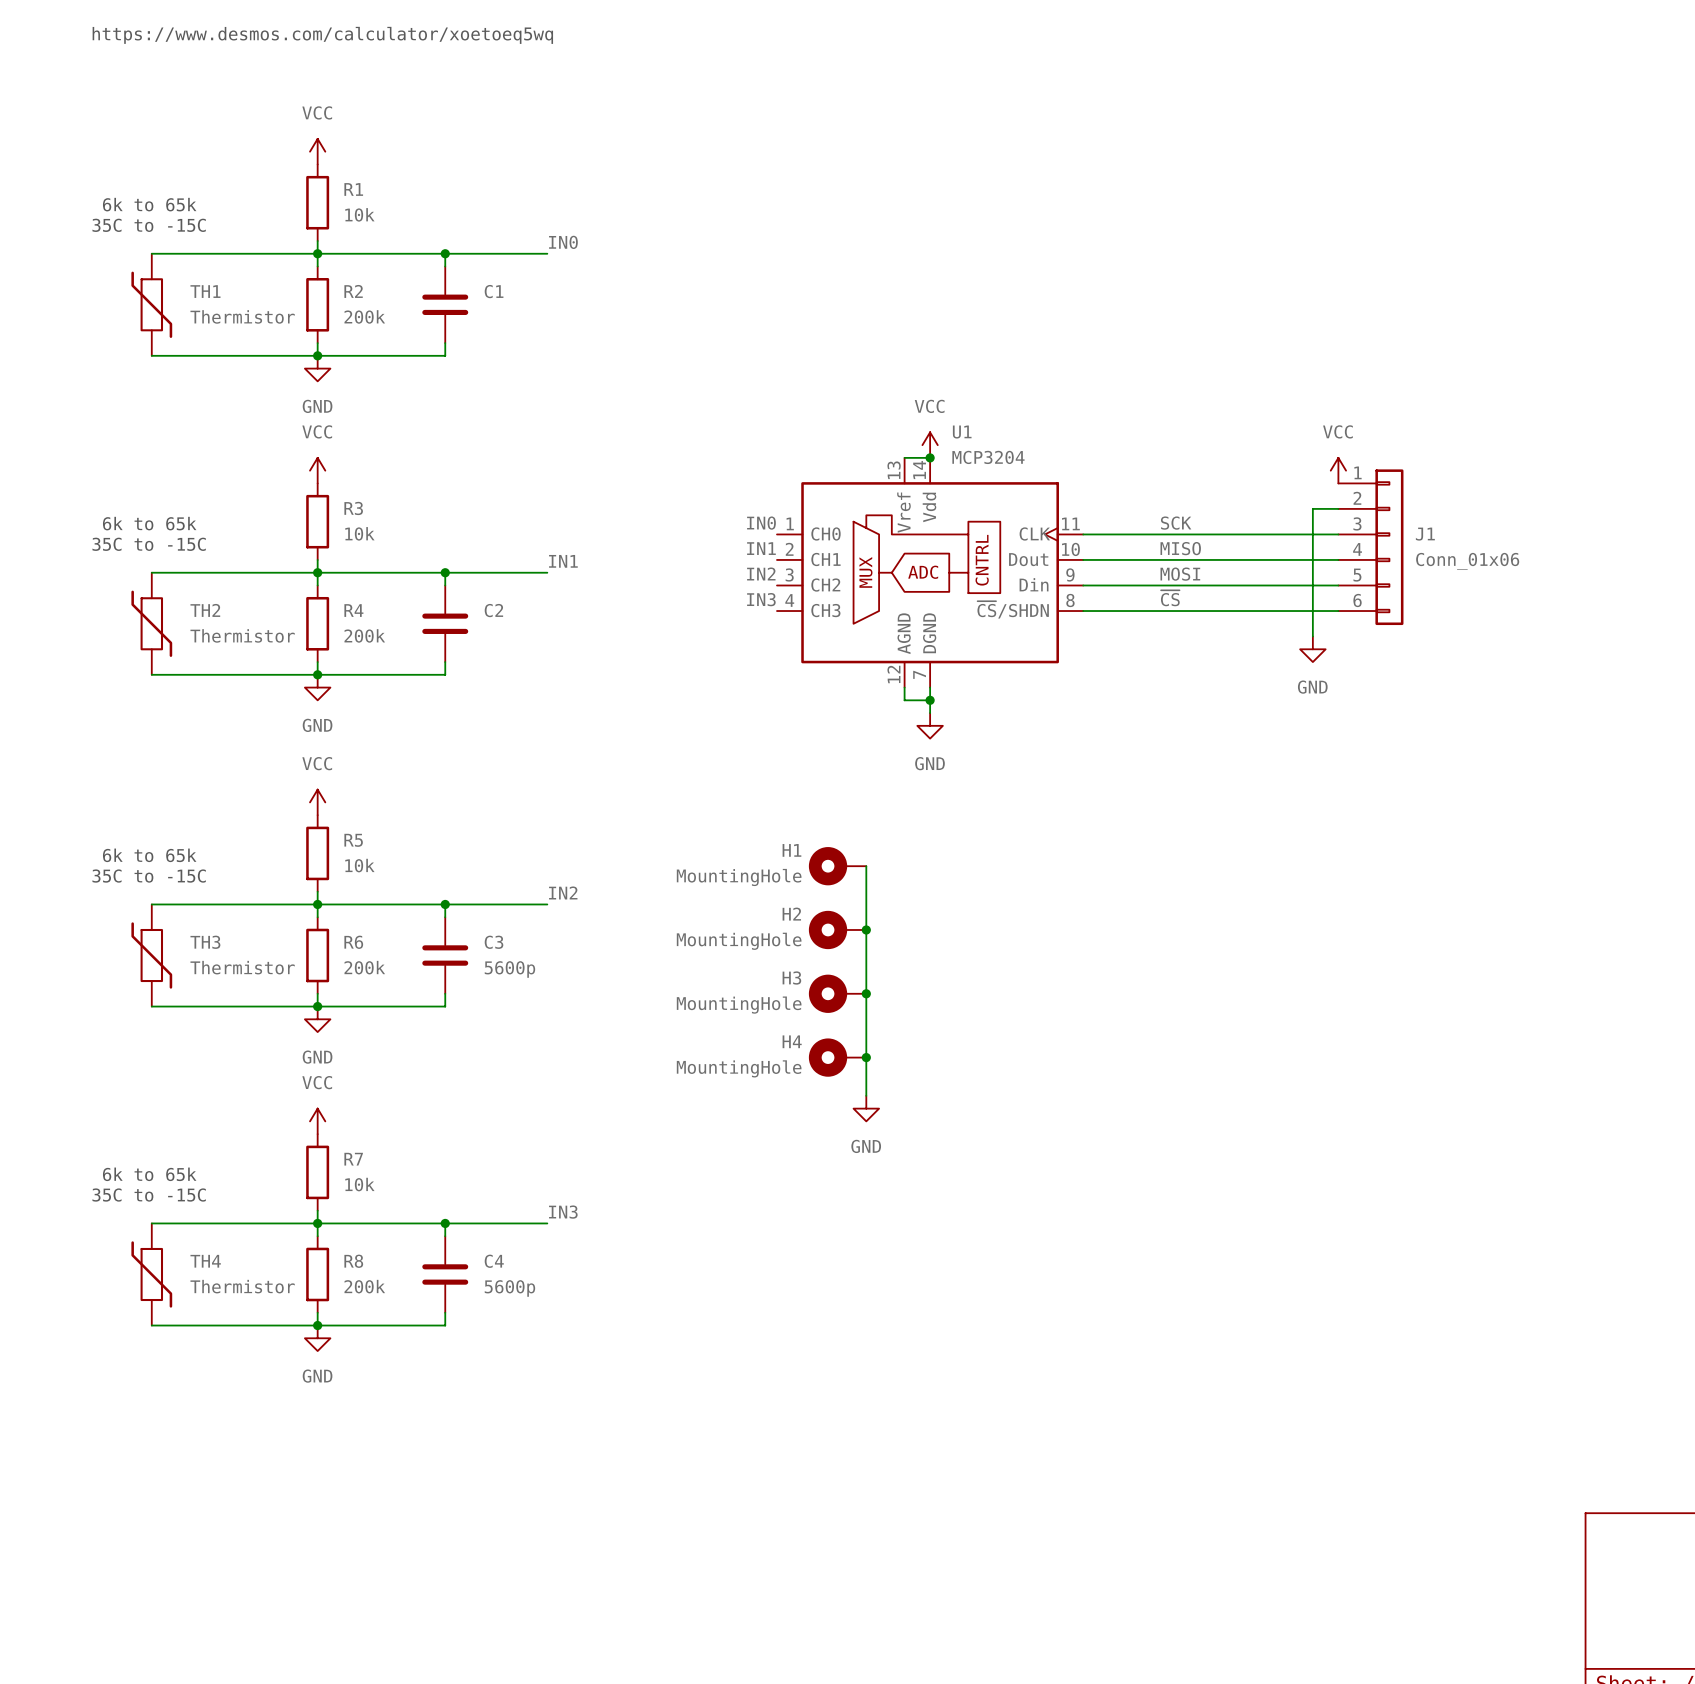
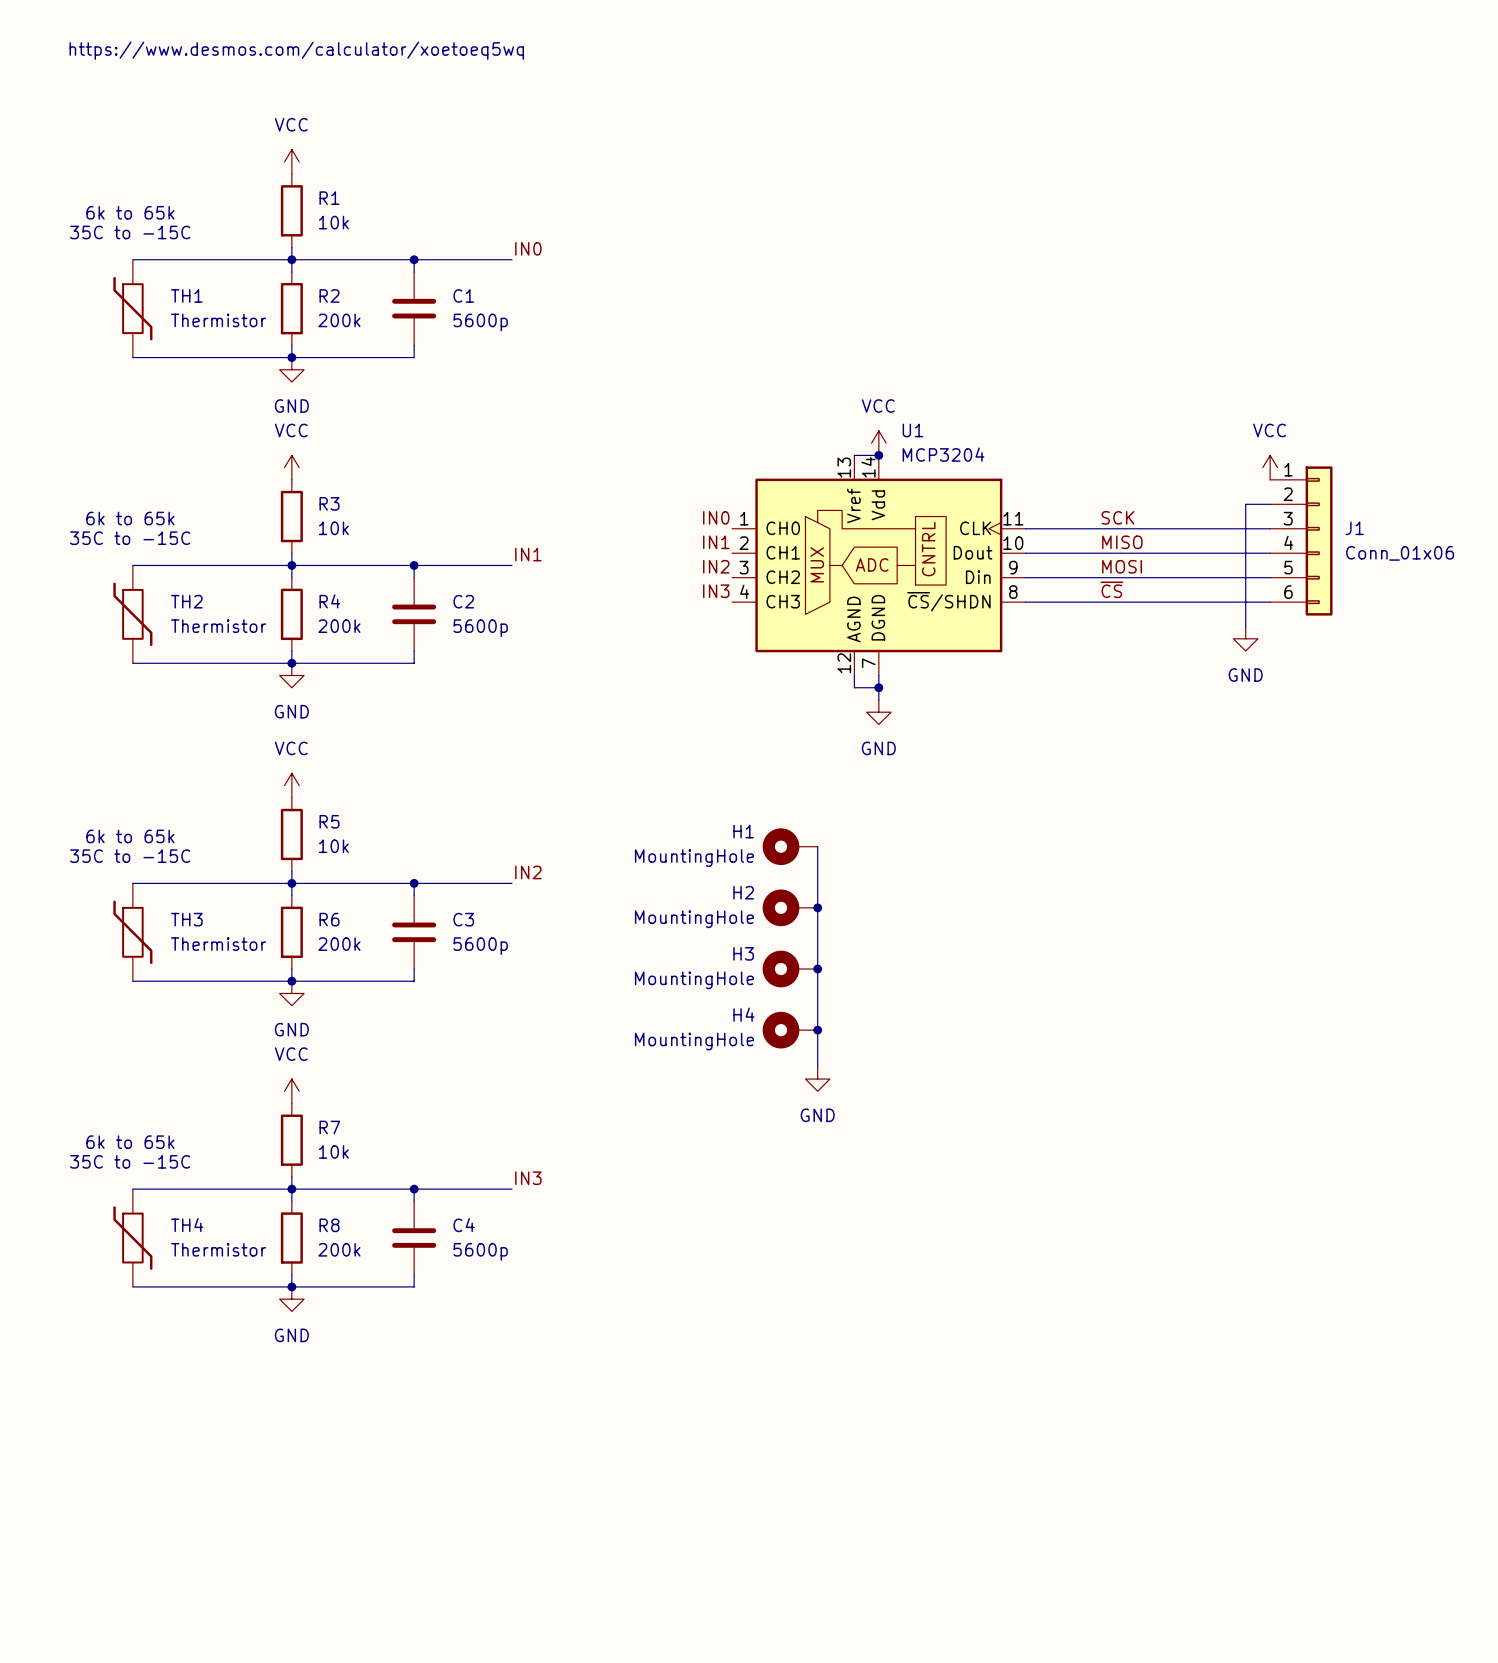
C1 value: none -> 5600p (480, 322)
C2 value: none -> 5600p (480, 628)

